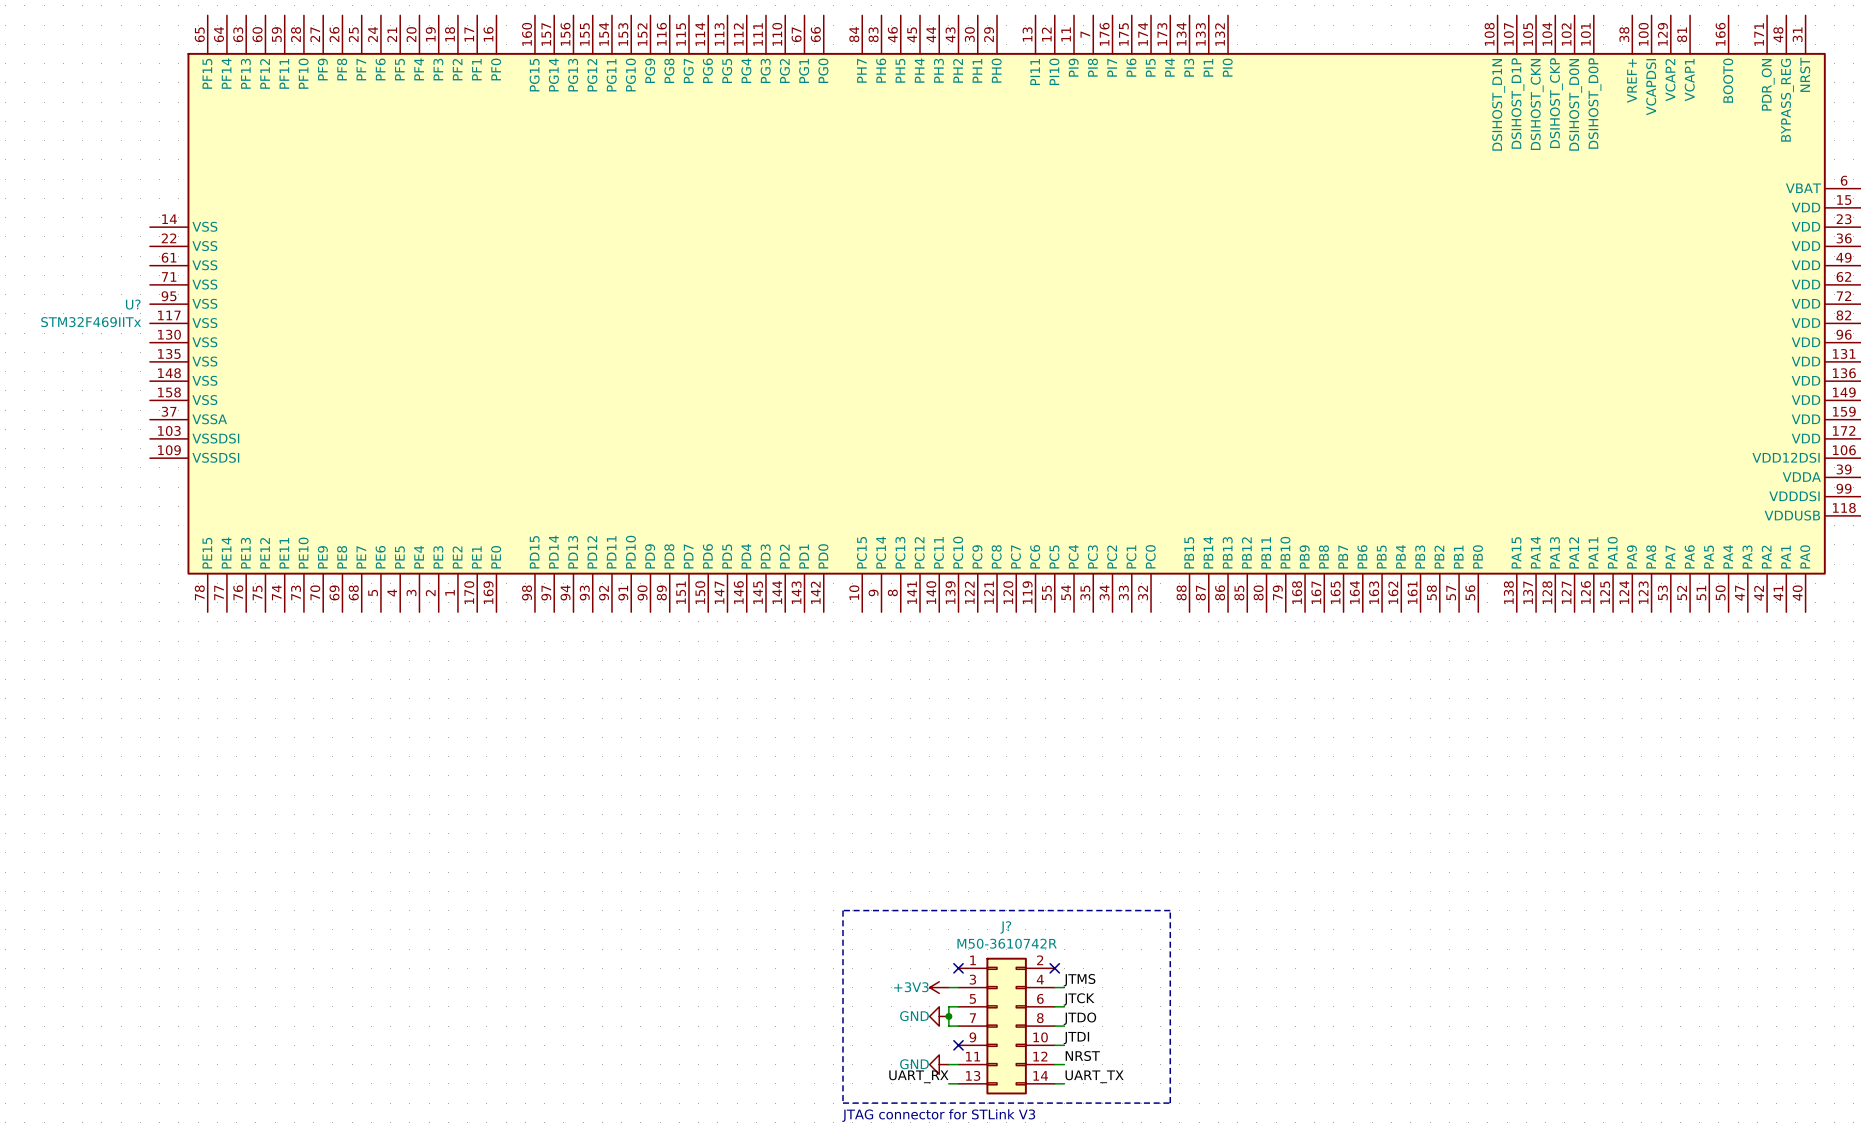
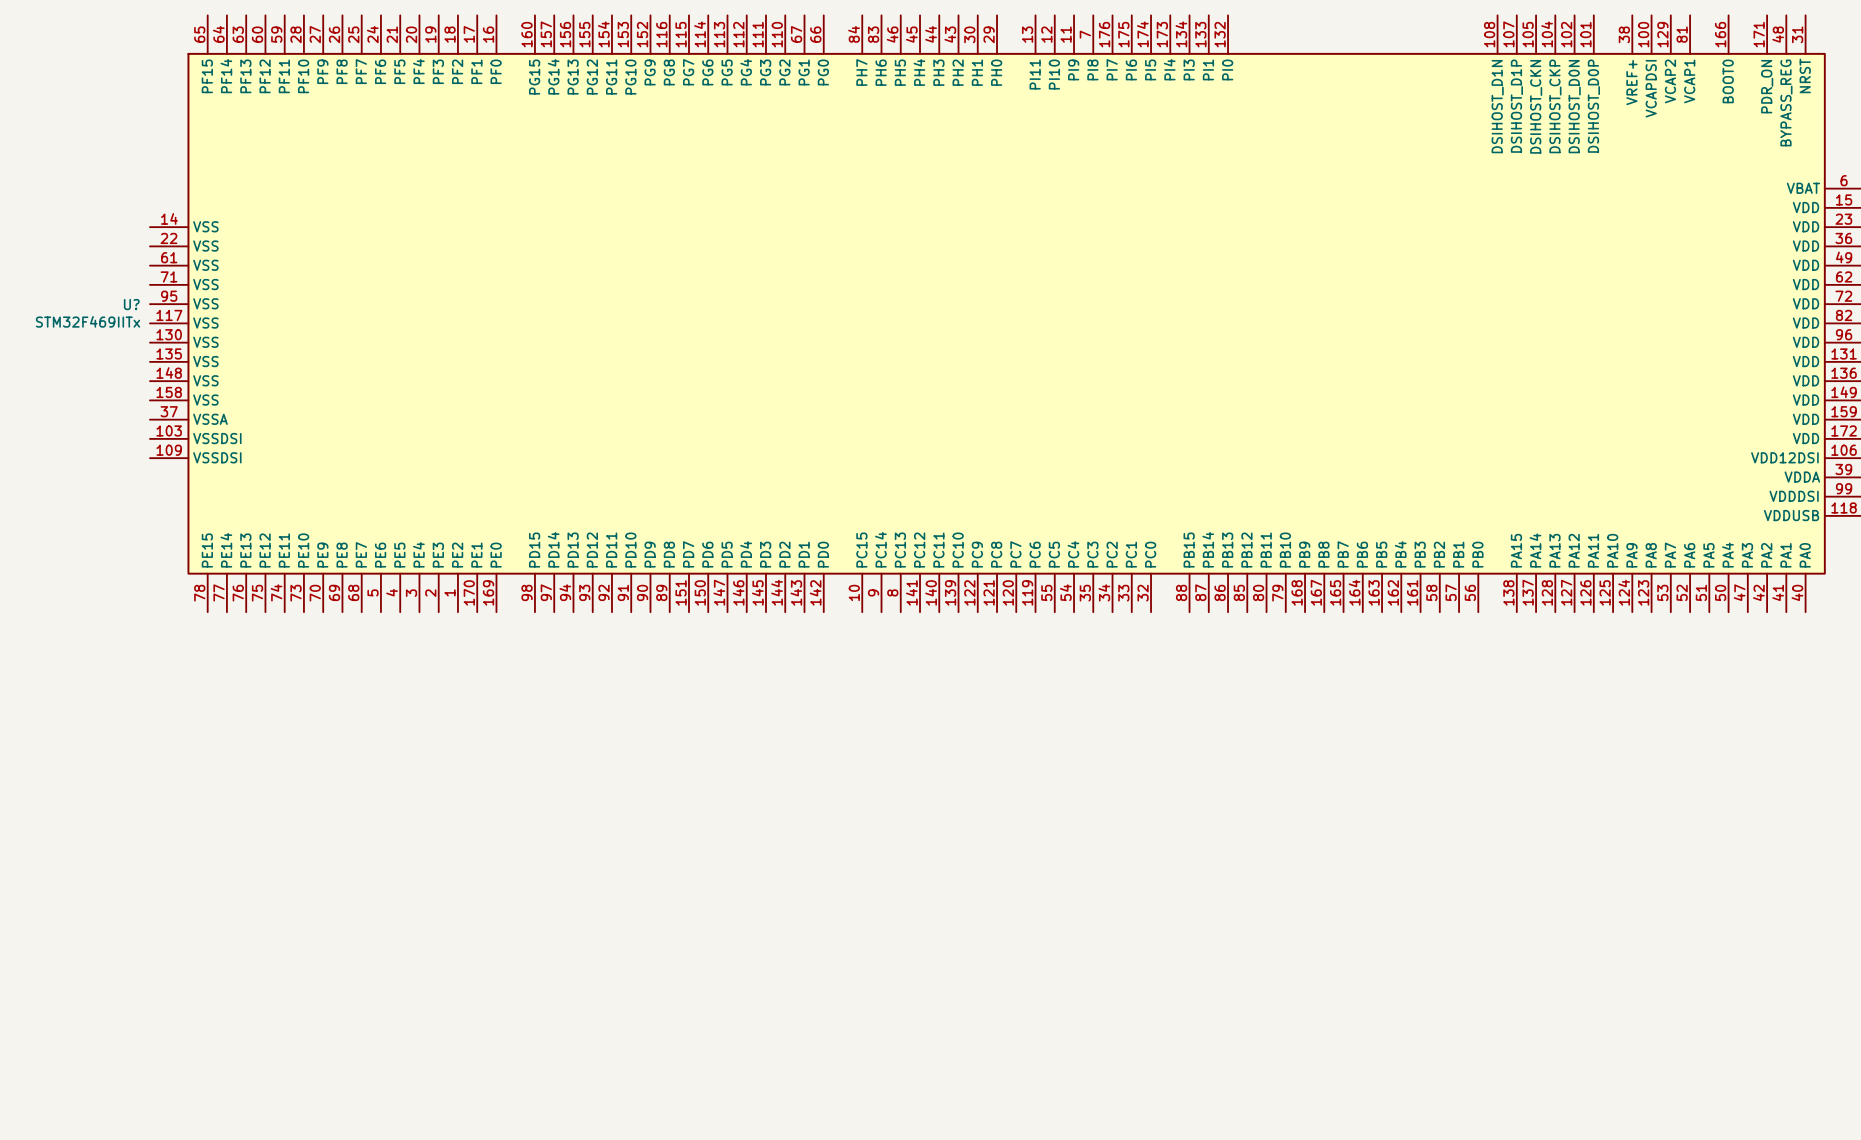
line: (843, 910) (1170, 910) (1170, 1103) (843, 1103) (843, 910) -> none
no-connect mark: (958, 968) -> none
no-connect mark: (1054, 968) -> none
label: JTMS (1079, 980) -> none
power symbol: +3V3 (939, 987) -> none
wire: (948, 987) (958, 987) -> none
wire: (1054, 987) (1064, 987) -> none
label: JTCK (1079, 999) -> none
wire: (958, 1006) (948, 1006) (948, 1026) (958, 1026) -> none
wire: (1054, 1006) (1064, 1006) -> none
power symbol: GND (939, 1016) -> none
junction: (948, 1016) -> none
label: JTDO (1079, 1018) -> none
J?: M50-3610742R (1006, 1026) -> none
wire: (1054, 1026) (1064, 1026) -> none
label: JTDI (1076, 1038) -> none
no-connect mark: (958, 1045) -> none
wire: (1054, 1045) (1064, 1045) -> none
label: NRST (1082, 1056) -> none
power symbol: GND (939, 1064) -> none
wire: (948, 1064) (958, 1064) -> none
wire: (1054, 1064) (1064, 1064) -> none
label: UART_RX (918, 1076) -> none
label: UART_TX (1094, 1076) -> none
wire: (948, 1083) (958, 1083) -> none
wire: (1054, 1083) (1064, 1083) -> none
text: JTAG connector for STLink V3 (938, 1115) -> none

